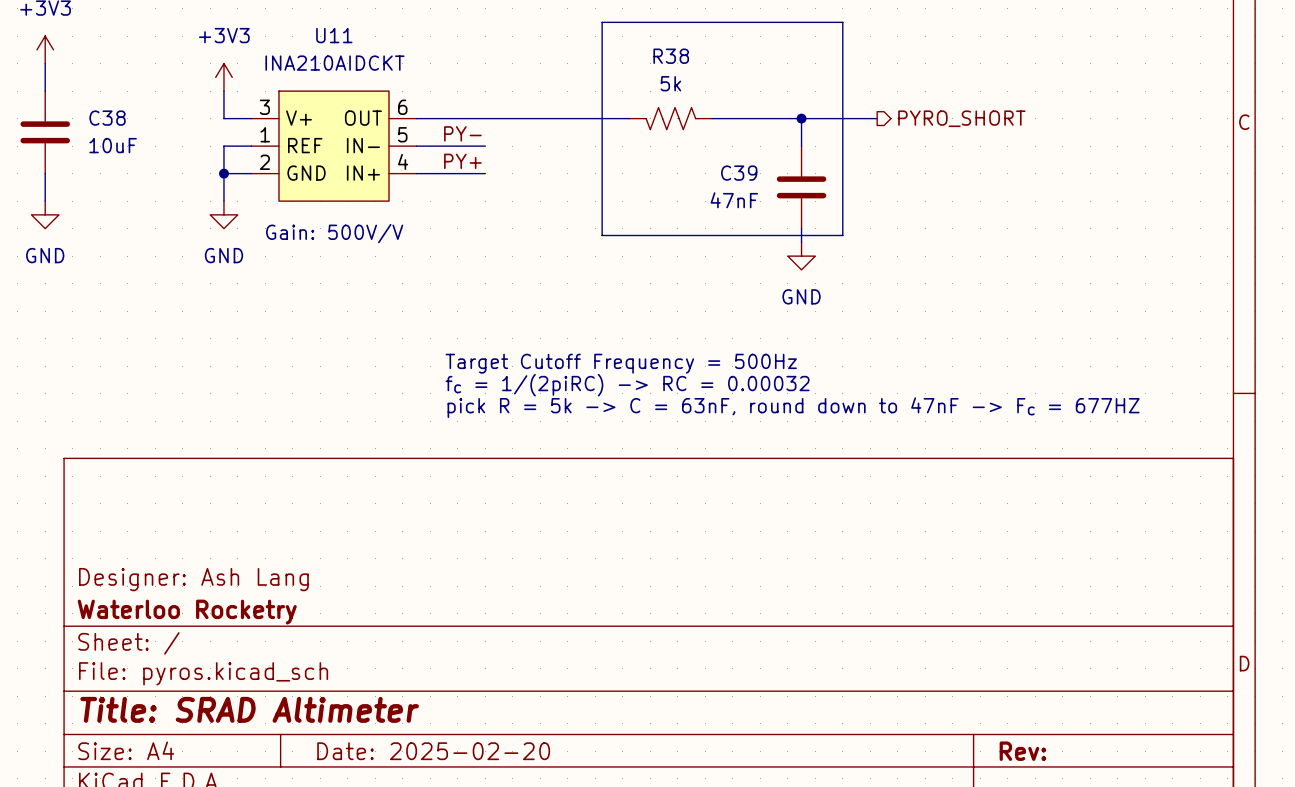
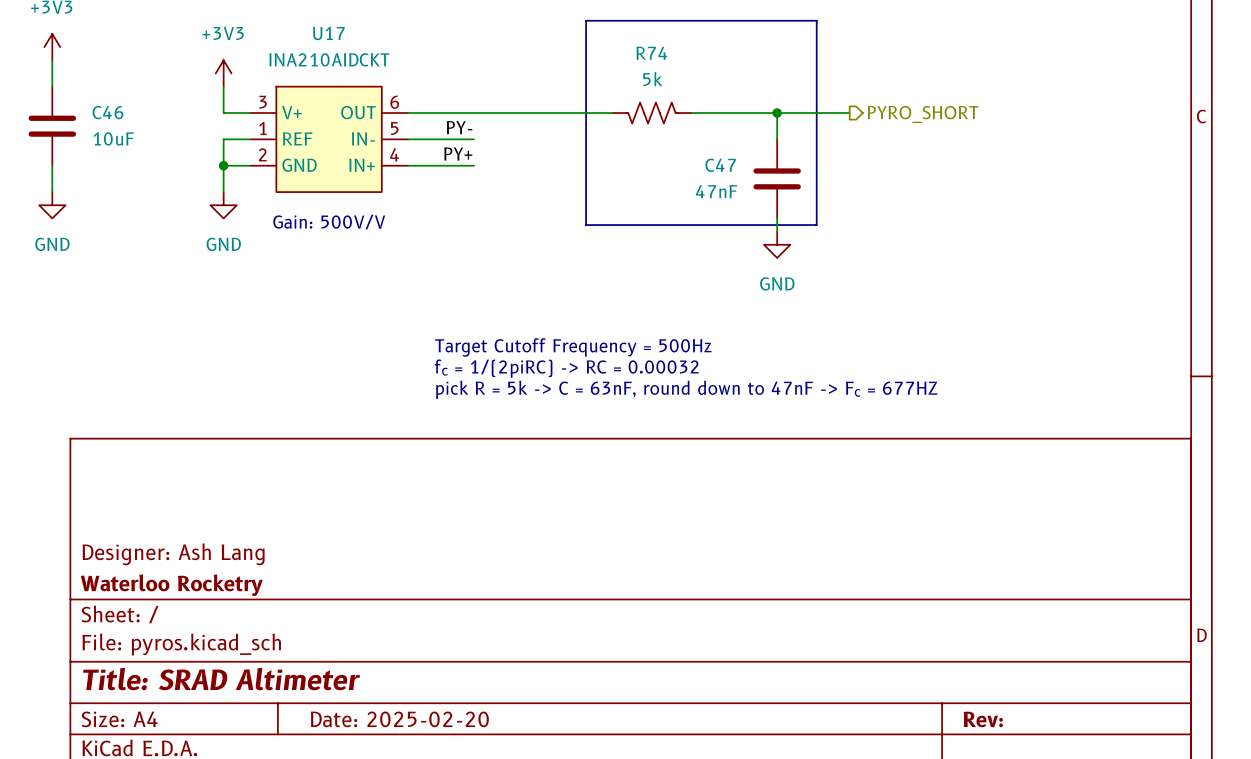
U11 name: U11 (334, 35) -> U17 (328, 33)
R38 name: R38 (671, 56) -> R74 (651, 53)
C38 name: C38 (107, 118) -> C46 (107, 112)
C39 name: C39 (739, 173) -> C47 (720, 165)

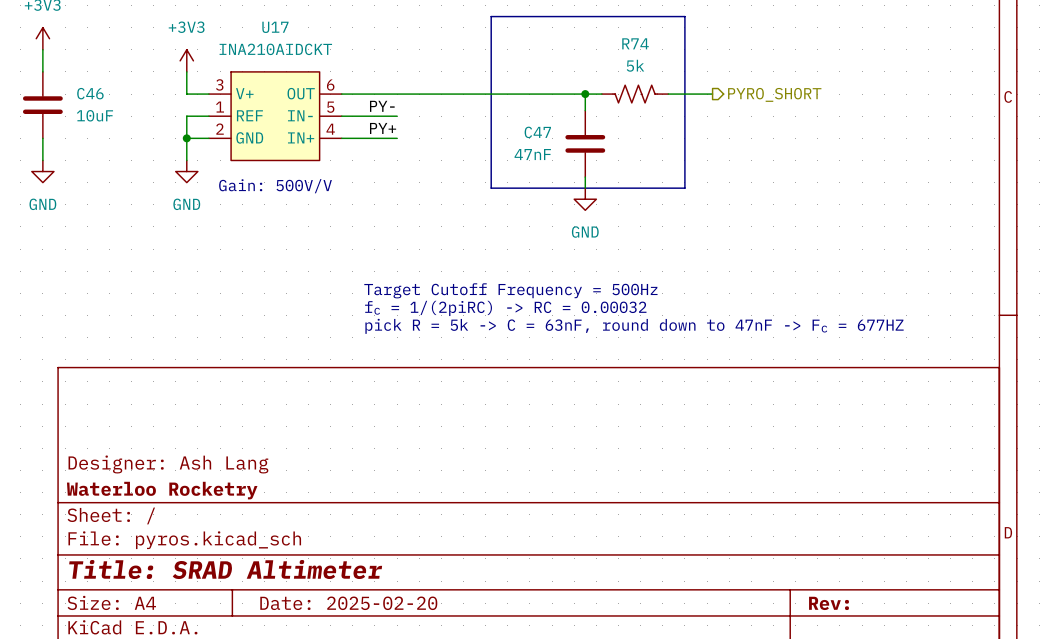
R74 position: (651, 113) -> (635, 94)
wire: none -> (585, 94) (585, 110)
junction: none -> (585, 94)
wire: (777, 113) (777, 139) -> none
junction: (777, 113) -> none
C47 position: (777, 178) -> (585, 143)
wire: (777, 218) (777, 231) -> (585, 177) (585, 188)
power symbol position: GND (777, 244) -> GND (585, 199)

